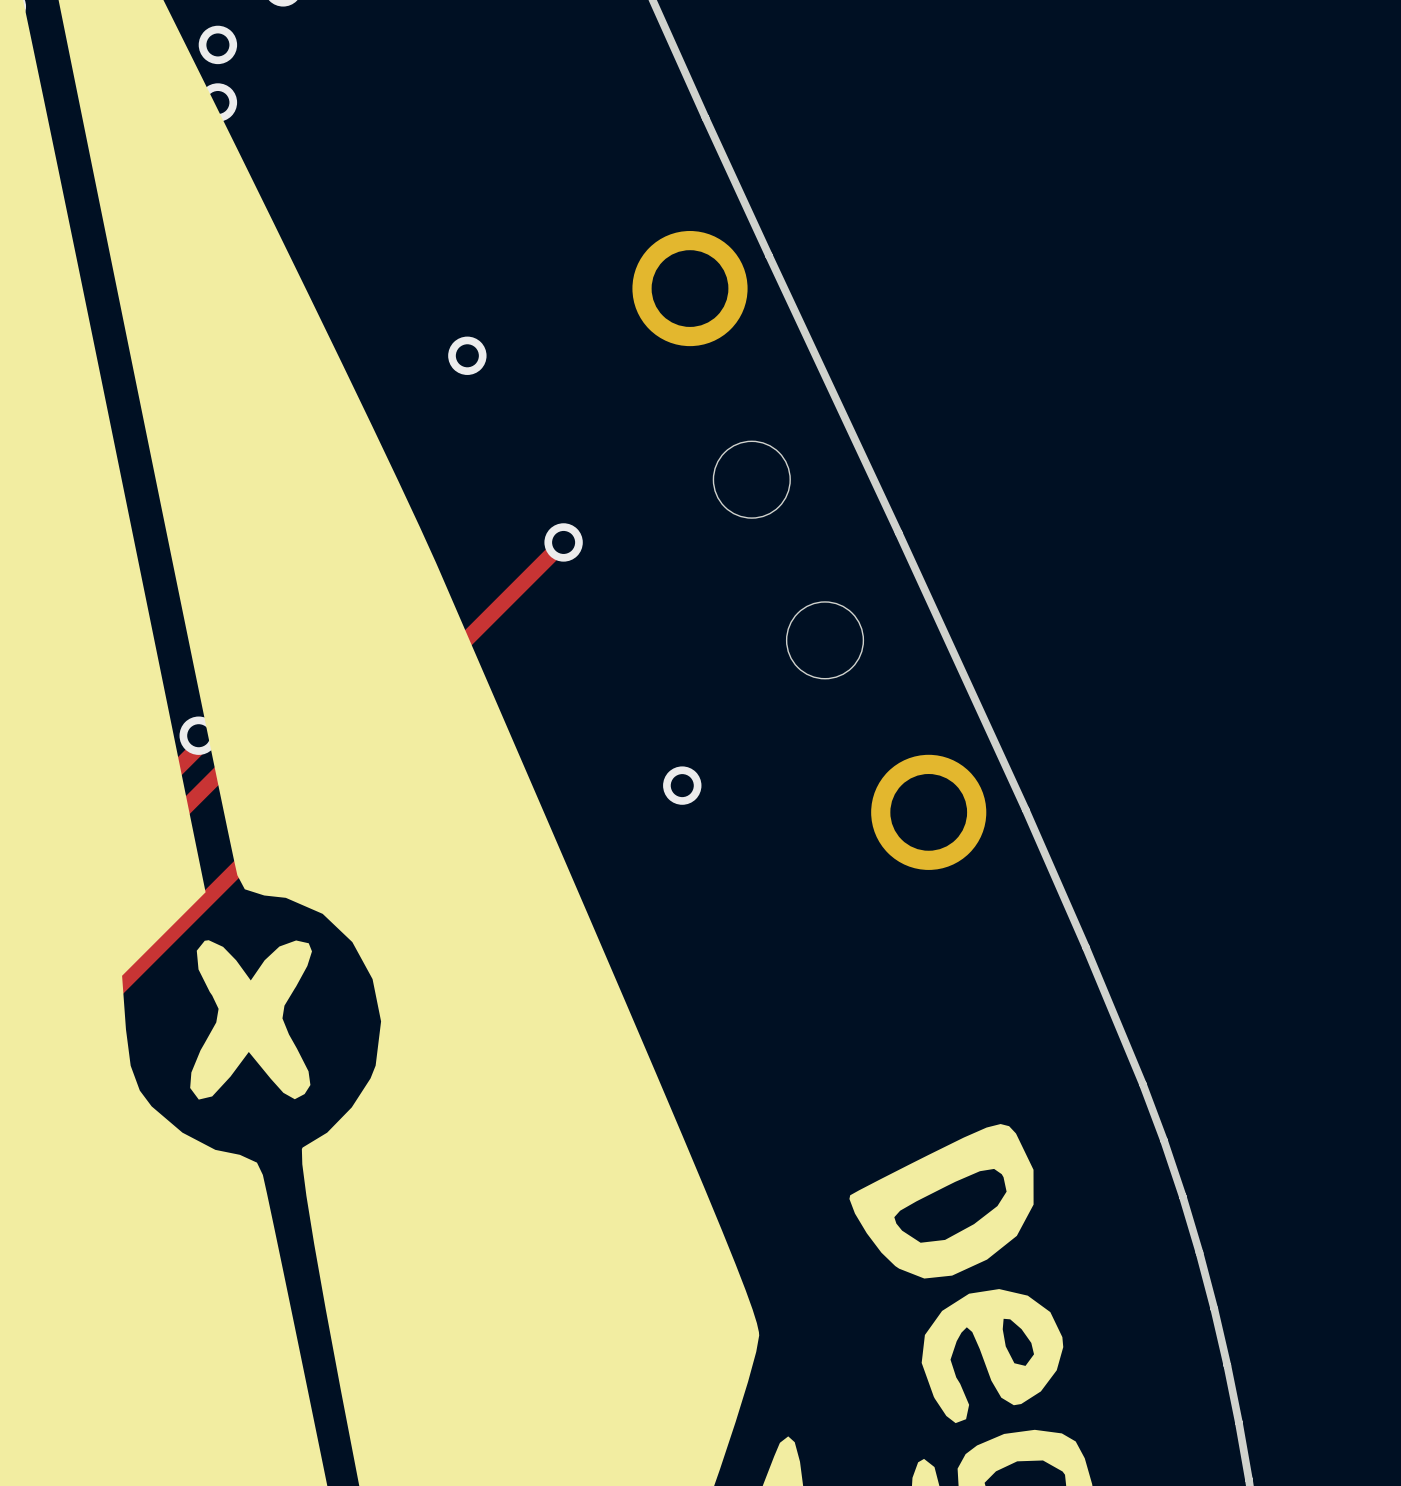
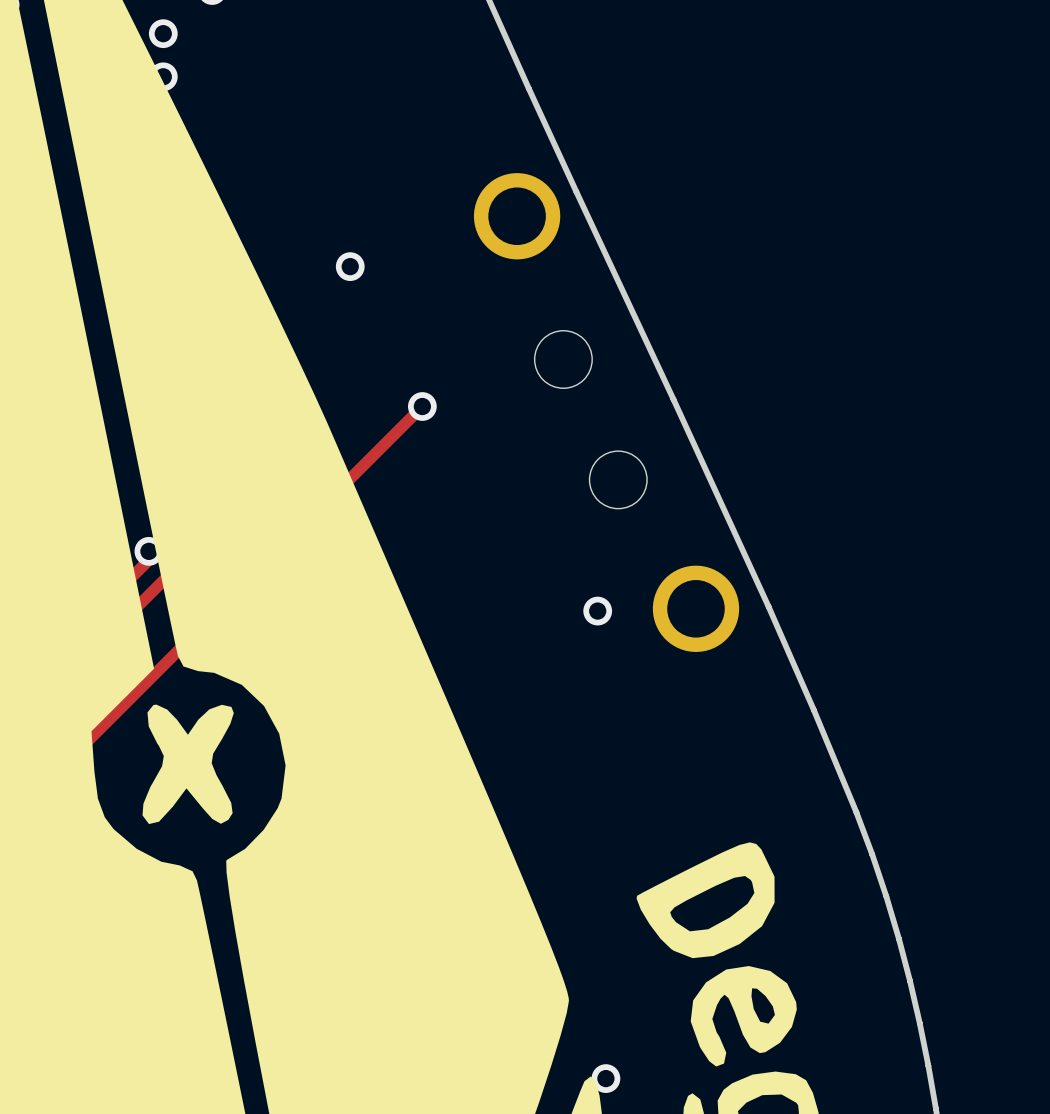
via position: (682, 785) -> (597, 611)
via: none -> (605, 1078)

